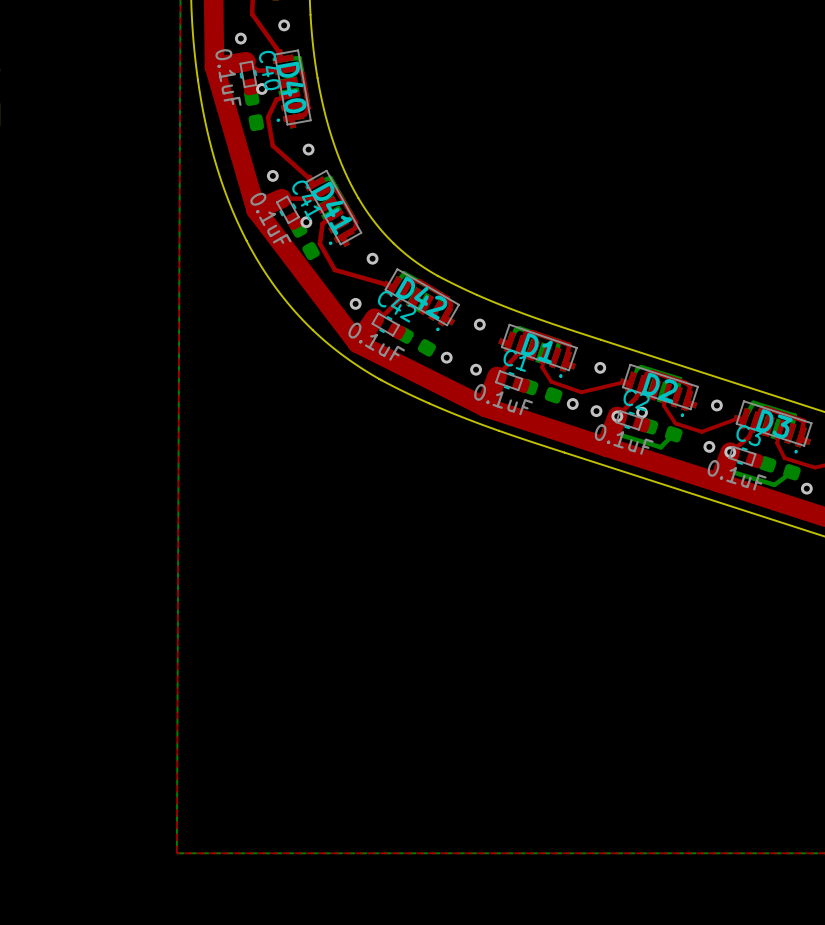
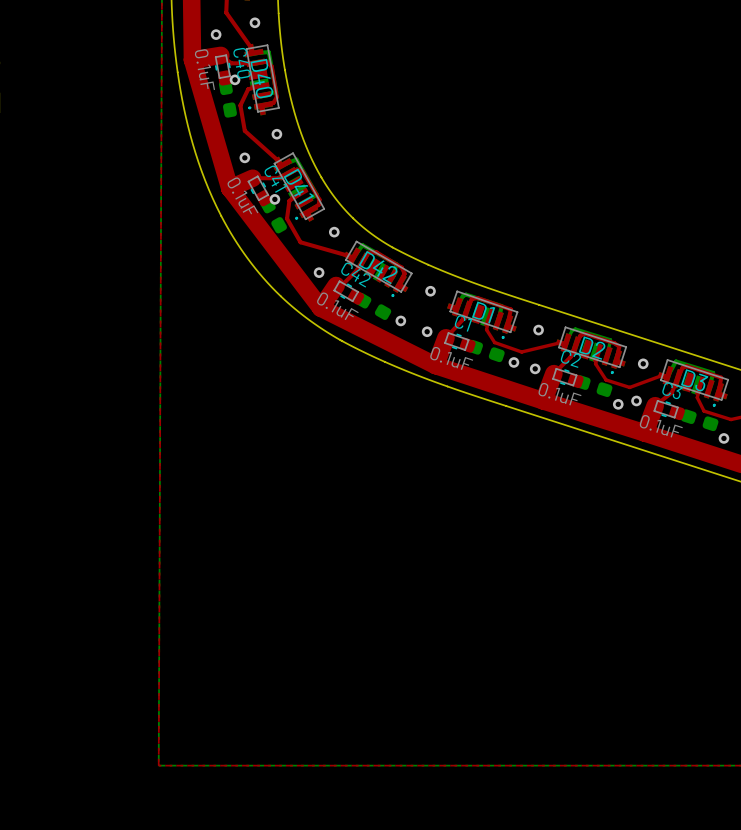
via: (642, 412) -> none
bottom track: (617, 416) (614, 426) (620, 435) (660, 447) (673, 434) -> none
via: (617, 416) -> none
via: none -> (618, 404)
bottom track: (730, 452) (730, 471) (774, 484) (791, 472) -> none
via: (730, 452) -> none

